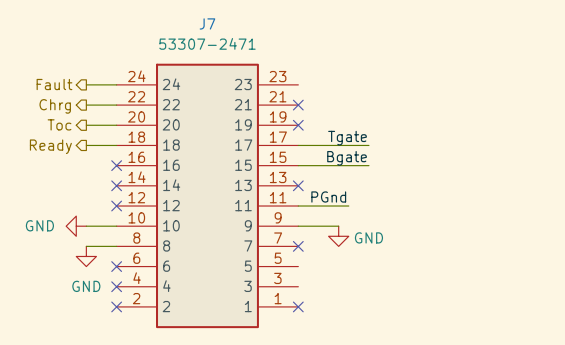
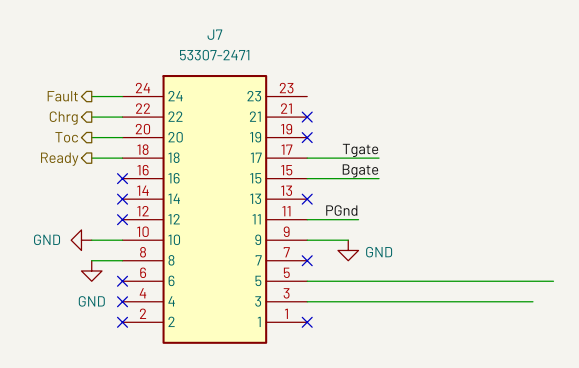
wire: none -> (307, 281) (553, 281)
wire: none -> (307, 301) (532, 301)

